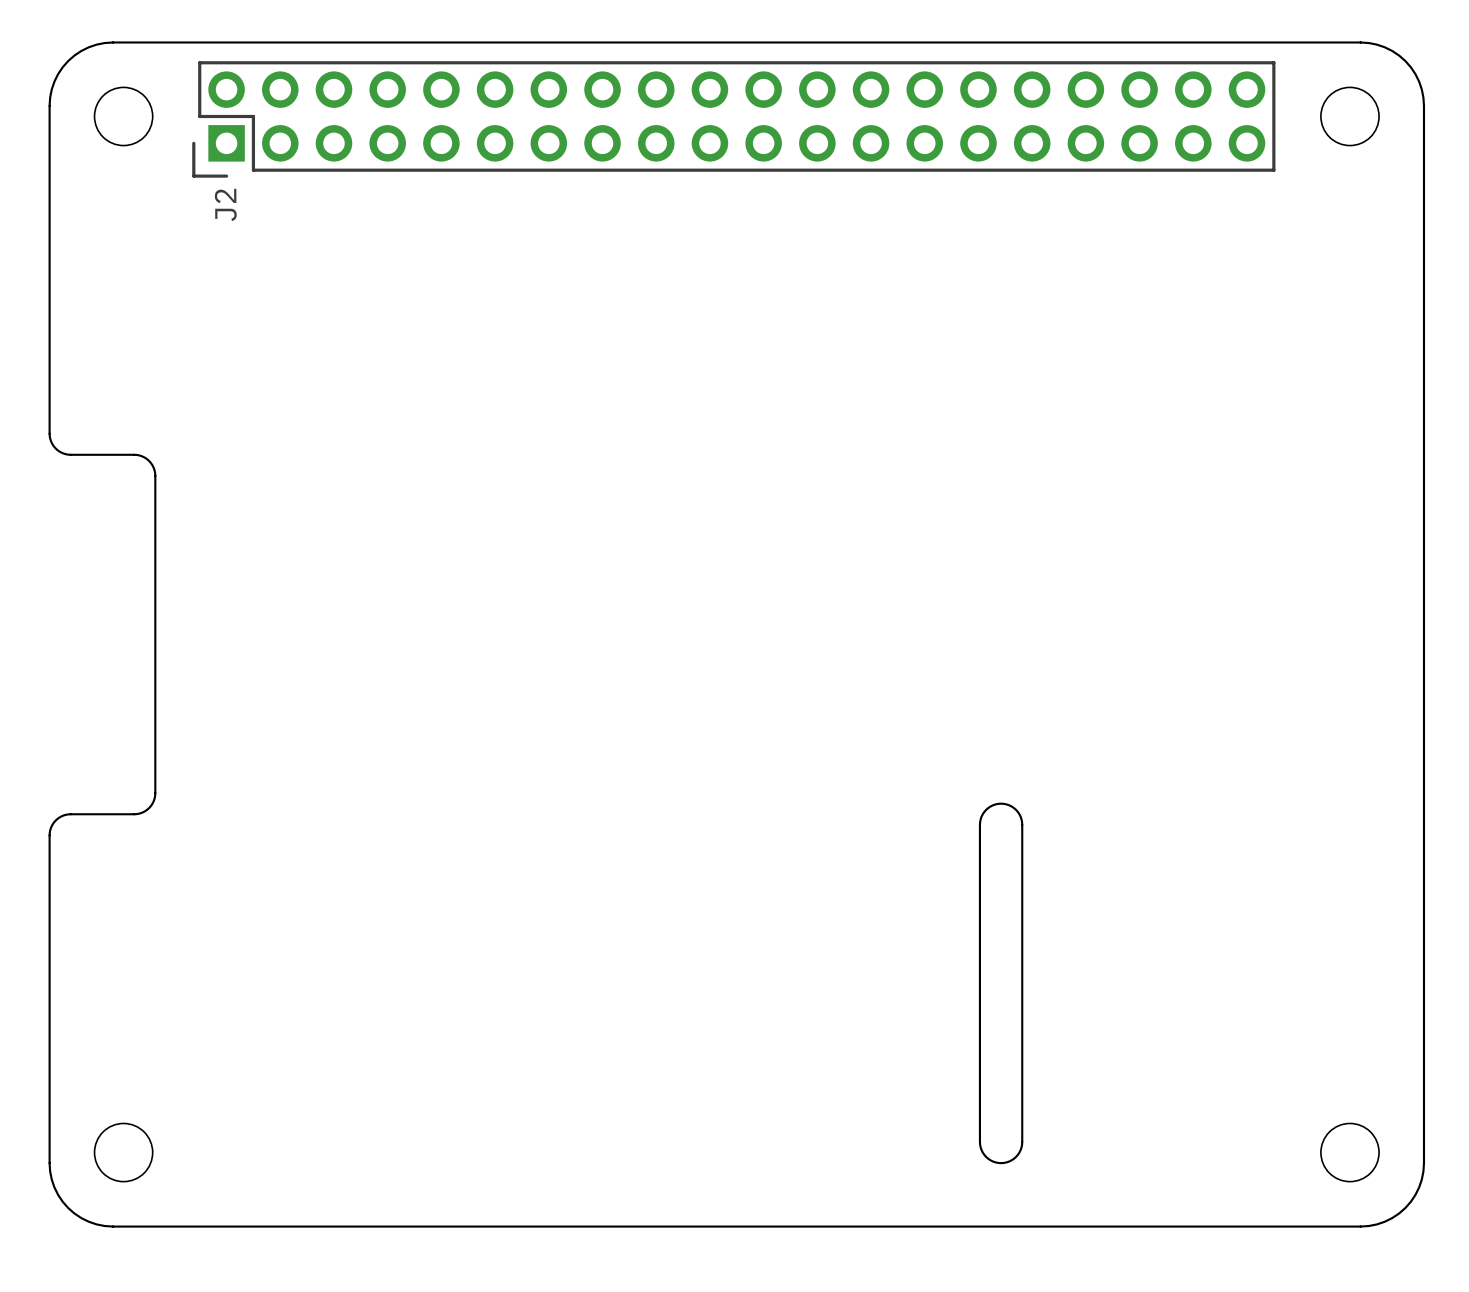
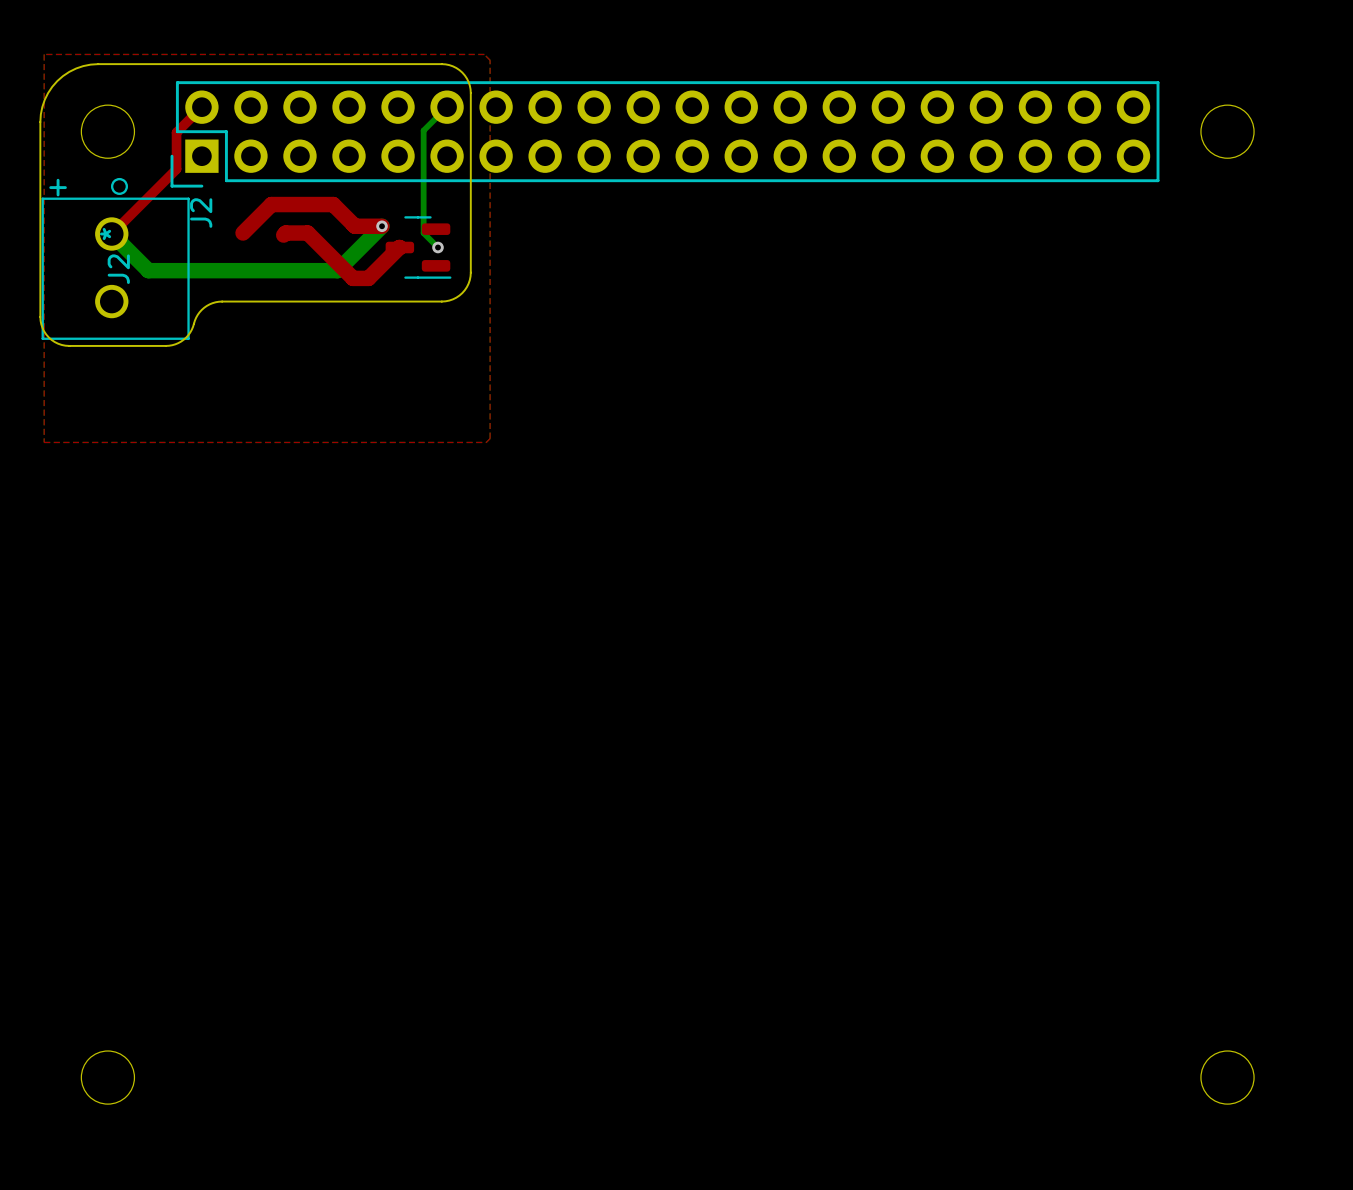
top zone outline: none -> (44, 54) (44, 442) (486, 442) (490, 438) (490, 60) (484, 54) (44, 54)
board edge: (489, 42) (1360, 42) (1384, 47) (1399, 55) (1410, 67) (1419, 81) (1423, 105) (1423, 1163) (1421, 1179) (1415, 1194) (1399, 1213) (1376, 1224) (1360, 1226) (113, 1226) (96, 1224) (81, 1218) (62, 1201) (54, 1187) (50, 1171) (49, 833) (54, 822) (63, 815) (136, 814) (147, 809) (154, 800) (155, 475) (152, 464) (141, 455) (68, 454) (59, 451) (52, 444) (49, 433) (49, 319) -> (441, 64) (452, 66) (462, 72) (468, 81) (470, 93) (470, 276) (466, 287) (456, 297) (441, 301) (218, 301) (209, 304) (201, 309) (190, 332) (183, 339) (175, 344) (165, 345) (61, 344) (46, 334) (40, 316)
top track: none -> (201, 107) (176, 132) (176, 169) (111, 233)
bottom track: none -> (447, 107) (423, 130) (423, 233) (437, 247)
text: none -> + (58, 187)
top track: none -> (382, 226) (354, 226) (333, 204) (271, 204) (243, 233)
bottom track: none -> (382, 226) (337, 270) (148, 270) (111, 233)
via: none -> (382, 226)
top track: none -> (283, 235) (285, 233) (307, 233) (353, 278) (368, 278) (399, 247)
part: none -> (418, 247)
via: none -> (437, 247)
J2: none -> (115, 258)
board edge: (979, 824) (980, 1144) (982, 1152) (988, 1158) (995, 1162) (1003, 1162) (1011, 1160) (1017, 1154) (1022, 1141) (1022, 822) (1019, 814) (1013, 808) (1001, 803) (993, 805) (986, 809) (981, 816) (979, 824) -> none

